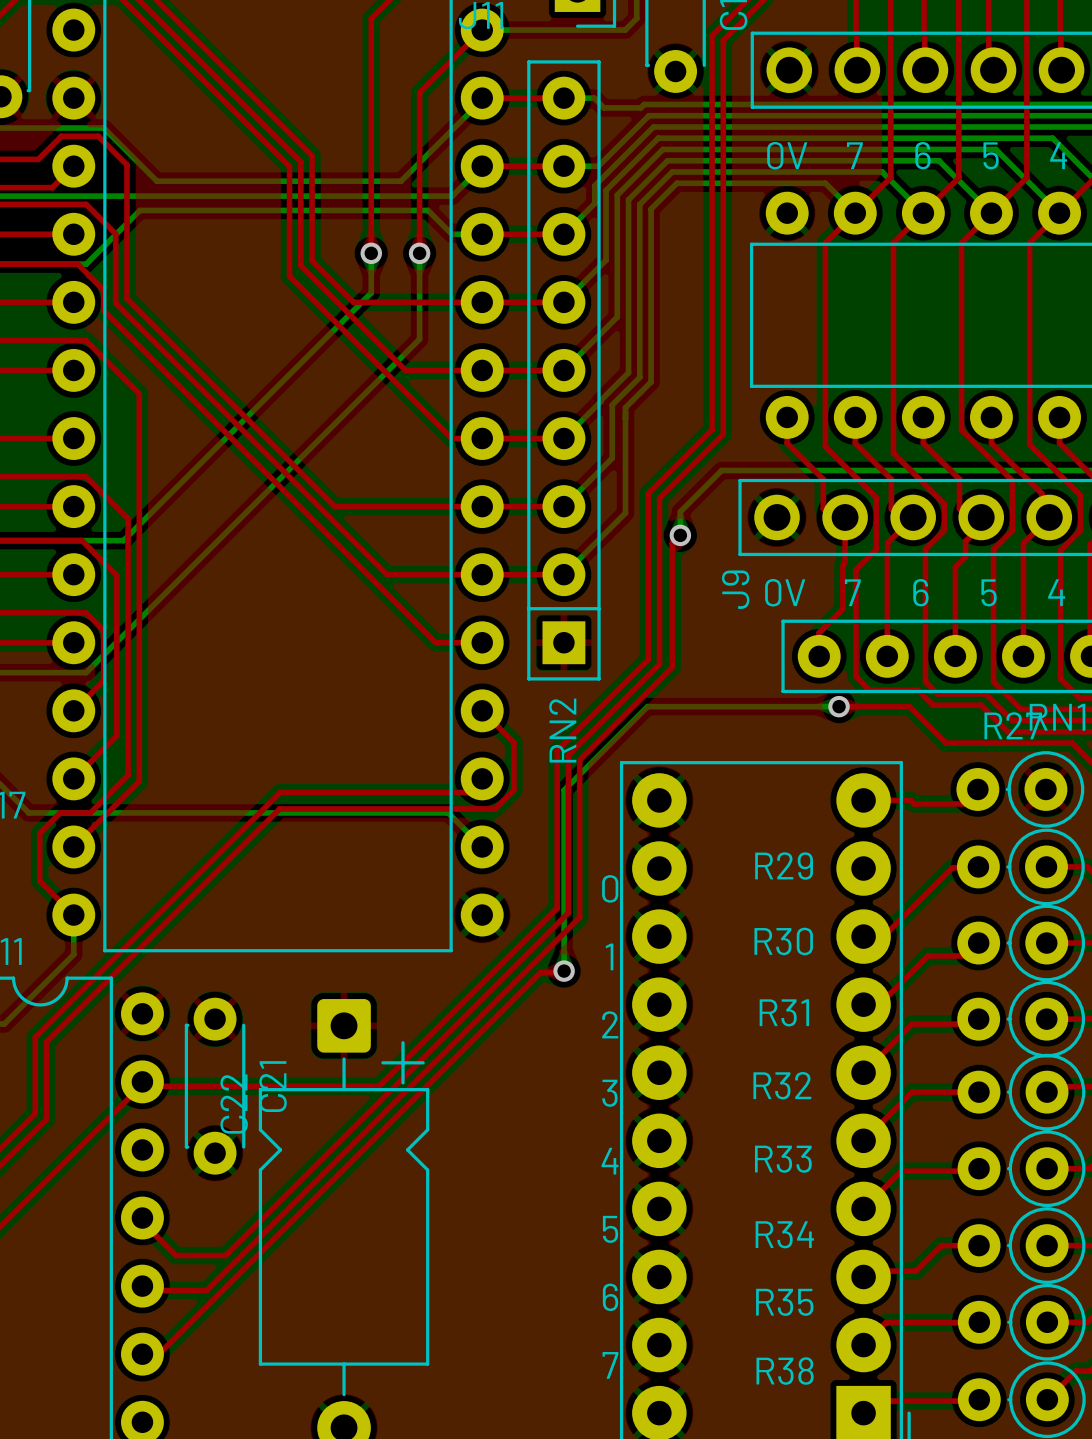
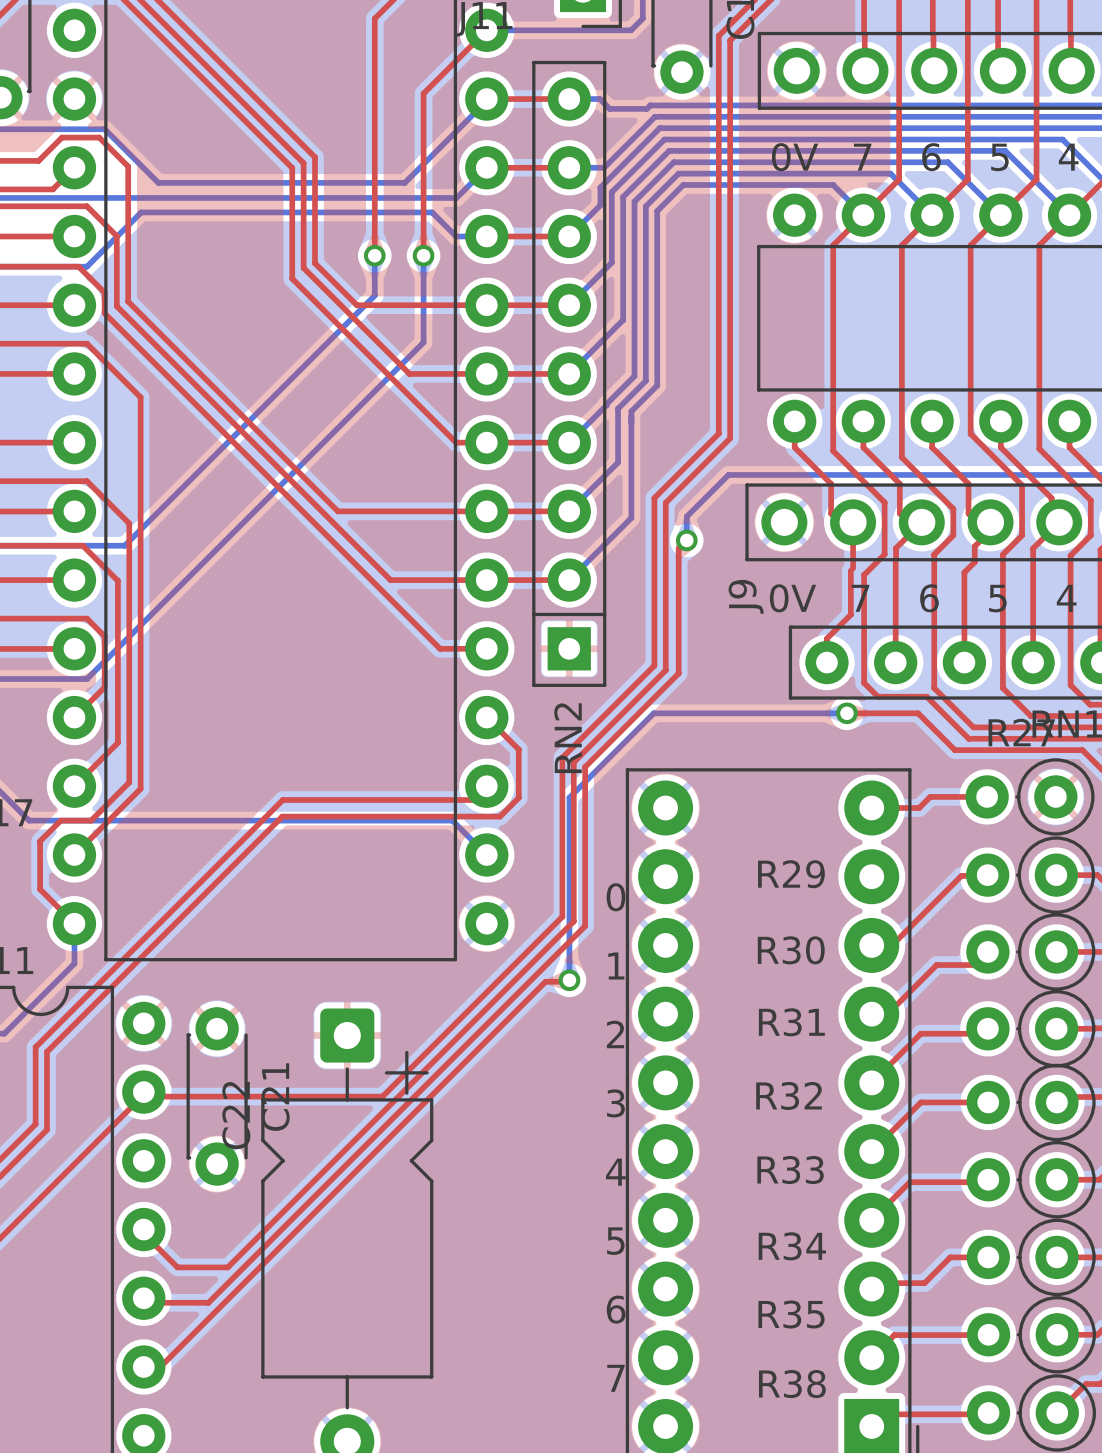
top track: (937, 693) (985, 693) (1012, 720) -> (946, 700) (973, 727) (1022, 727)
top track: (933, 705) (981, 705) (1007, 731) -> (941, 711) (968, 738) (1017, 738)
top track: (977, 789) (980, 791) (980, 801) (978, 803) (914, 803) (910, 800) -> (987, 796) (930, 796) (919, 808)

